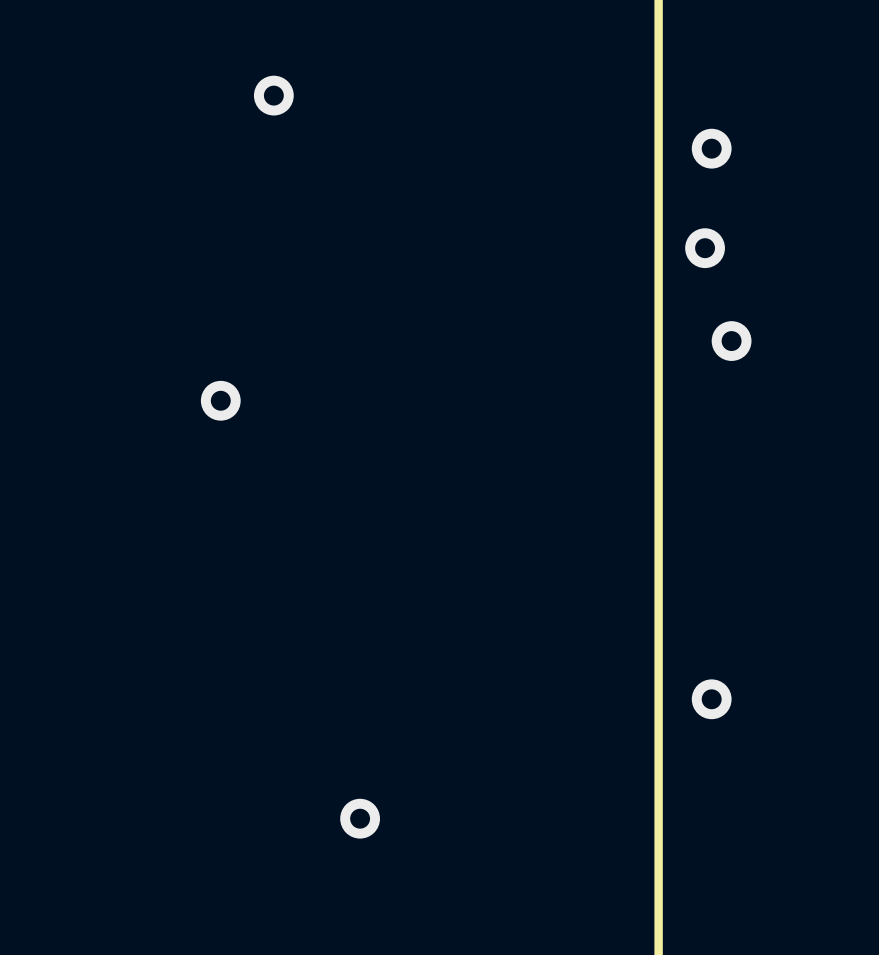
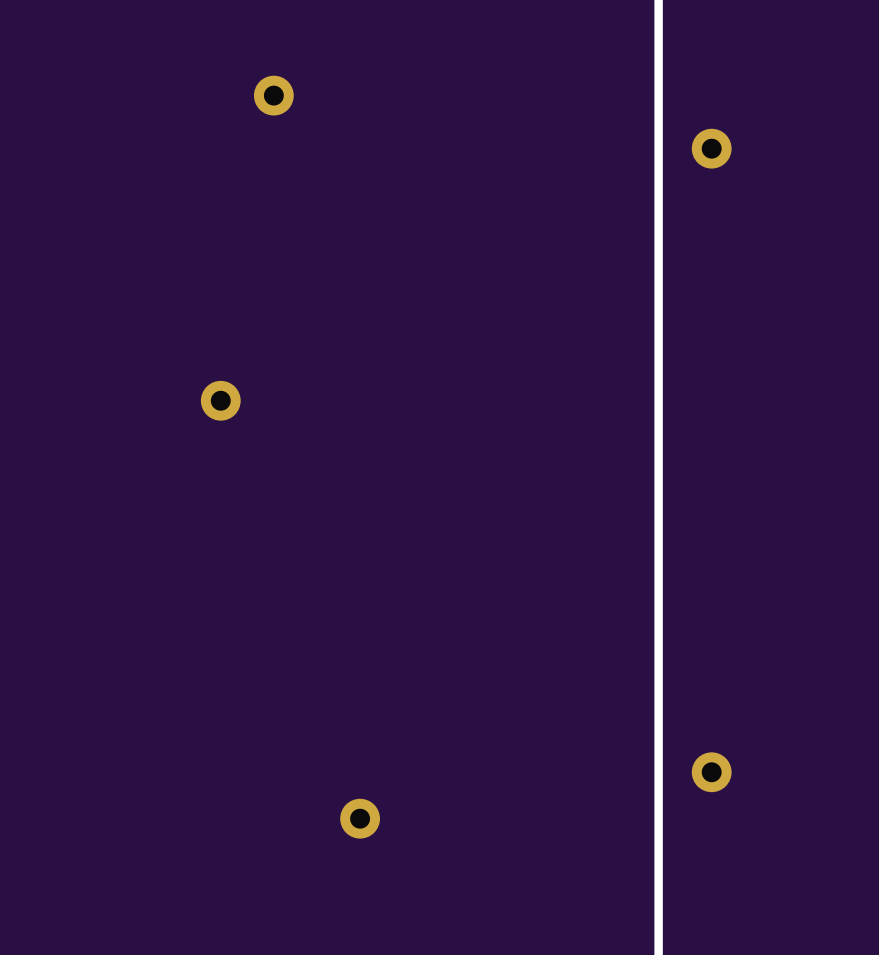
via: (705, 248) -> none
via: (731, 341) -> none
via position: (711, 699) -> (711, 772)

